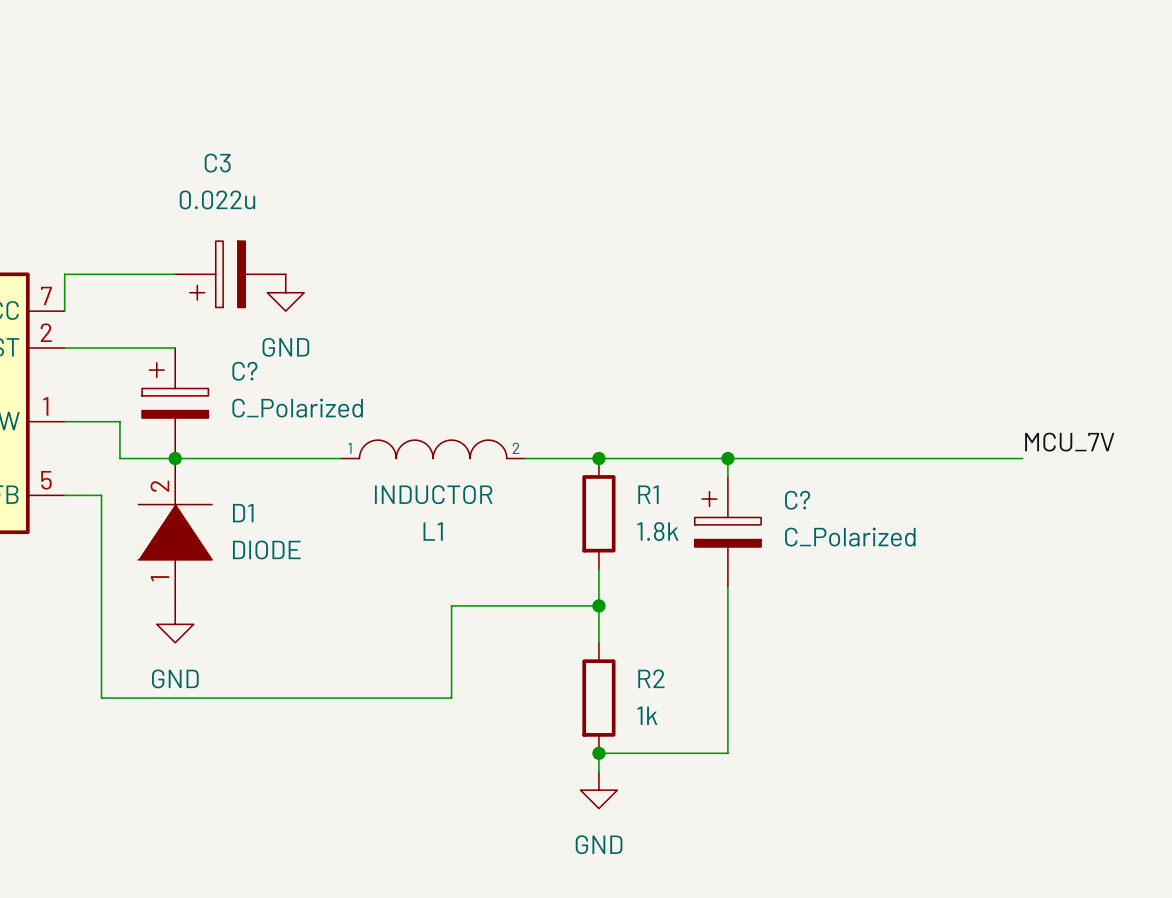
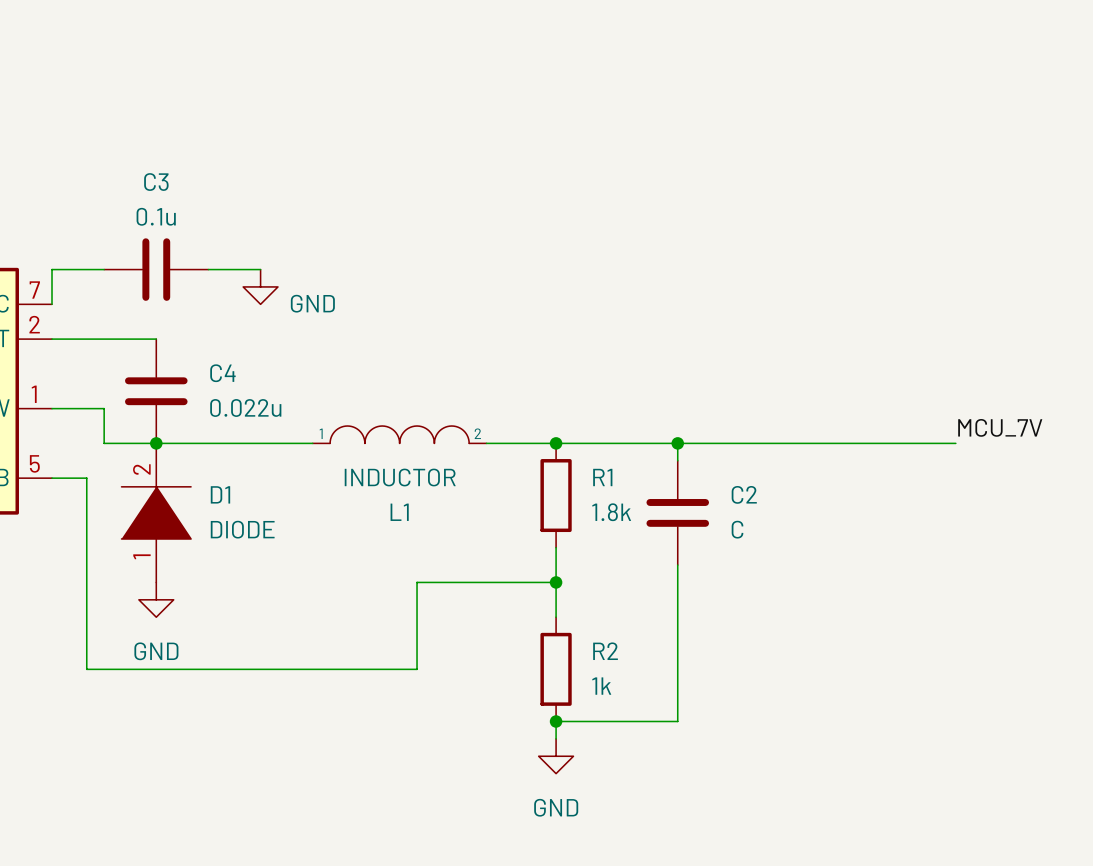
C3 value: 0.022u (217, 199) -> 0.1u (156, 216)
C3 symbol: [175, 241, 286, 308] -> [104, 238, 209, 301]
power symbol text position: GND (285, 347) -> GND (312, 303)
C?: C_Polarized (175, 403) -> none
C4: none -> 0.022u (156, 391)
C?: C_Polarized (727, 532) -> none
C2: none -> C (677, 512)

